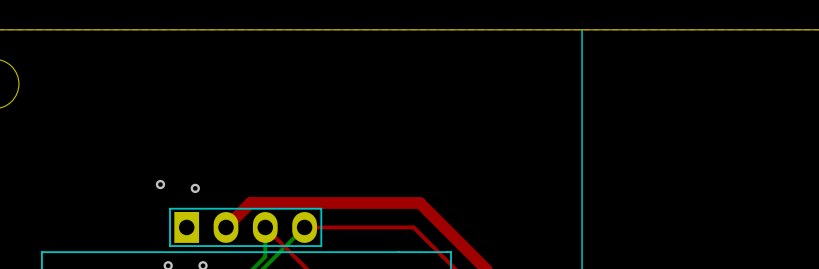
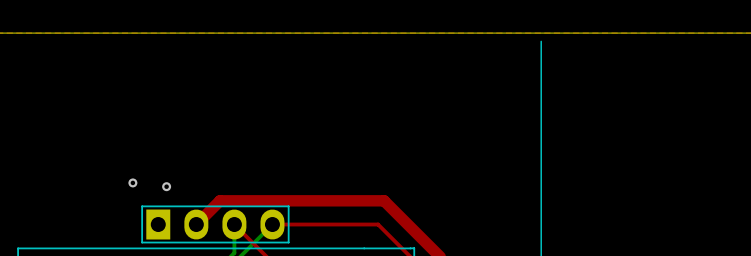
line: (582, 29) (582, 38) -> none

